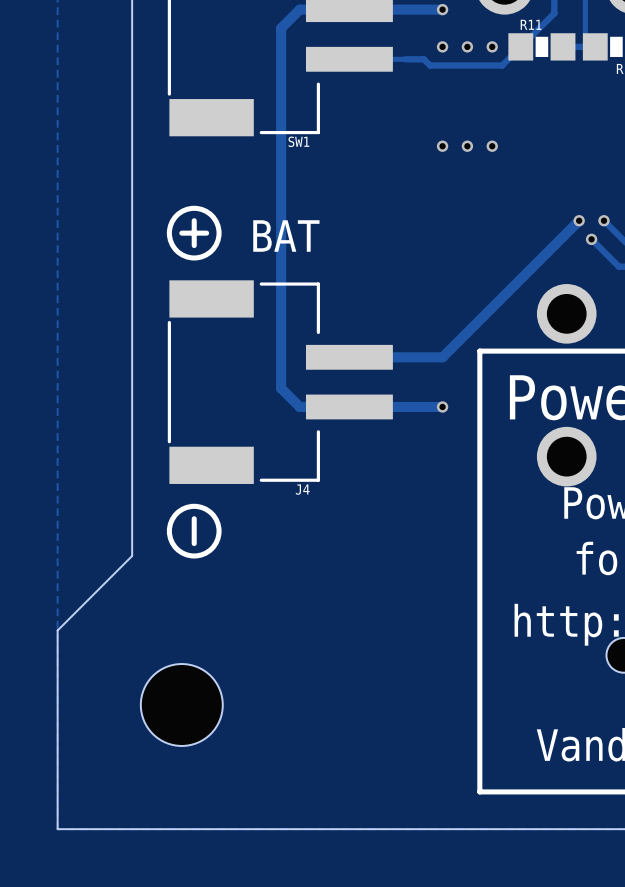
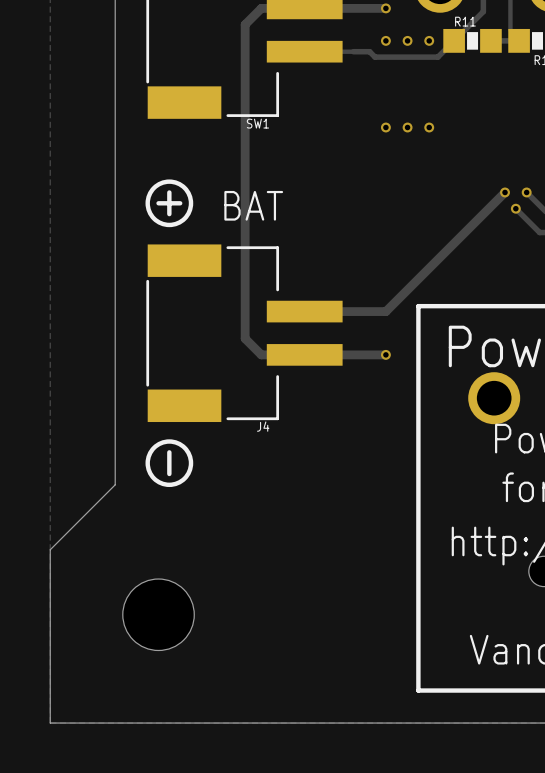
part: (566, 313) -> none

